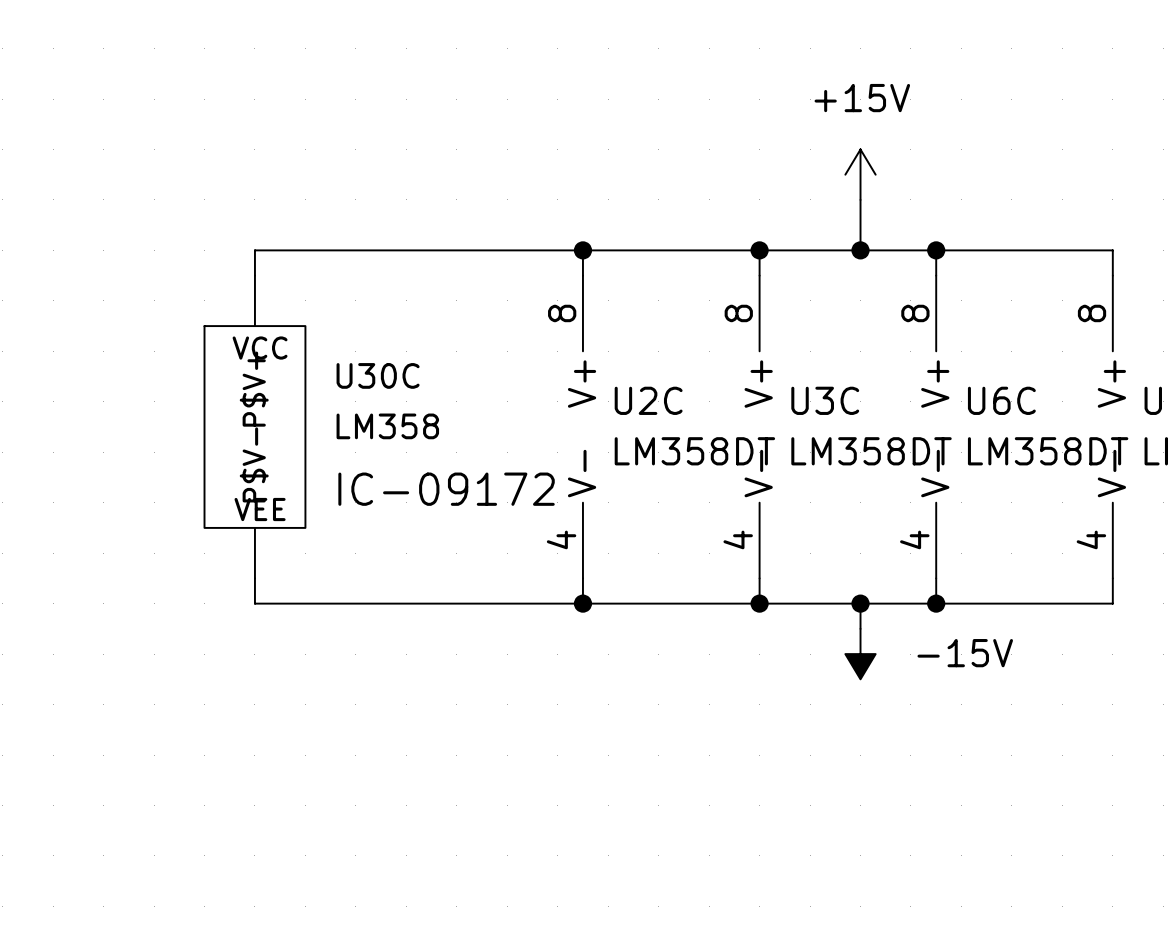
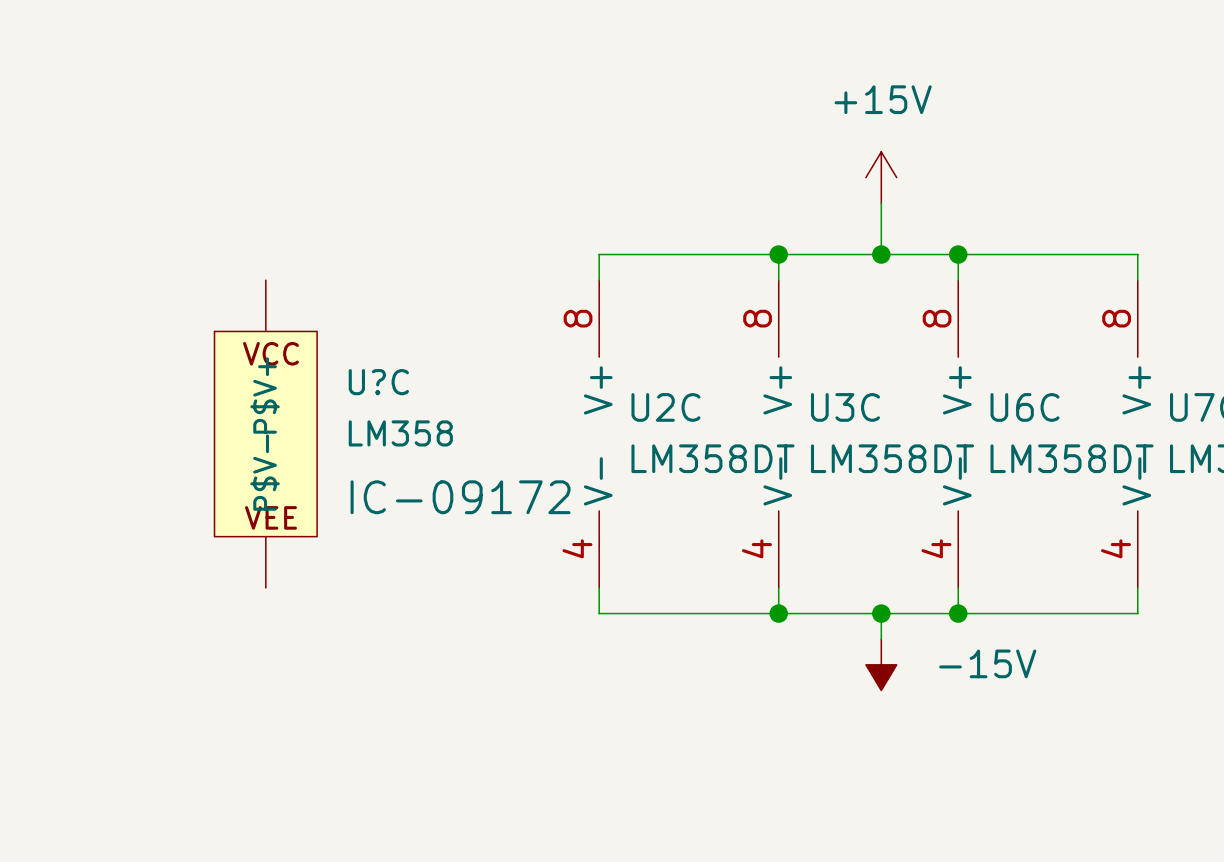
wire: (582, 250) (254, 250) (254, 275) -> none
junction: (582, 250) -> none
U30C name: U30C (378, 375) -> U?C (378, 382)
wire: (254, 578) (254, 603) (582, 603) -> none
junction: (582, 603) -> none

